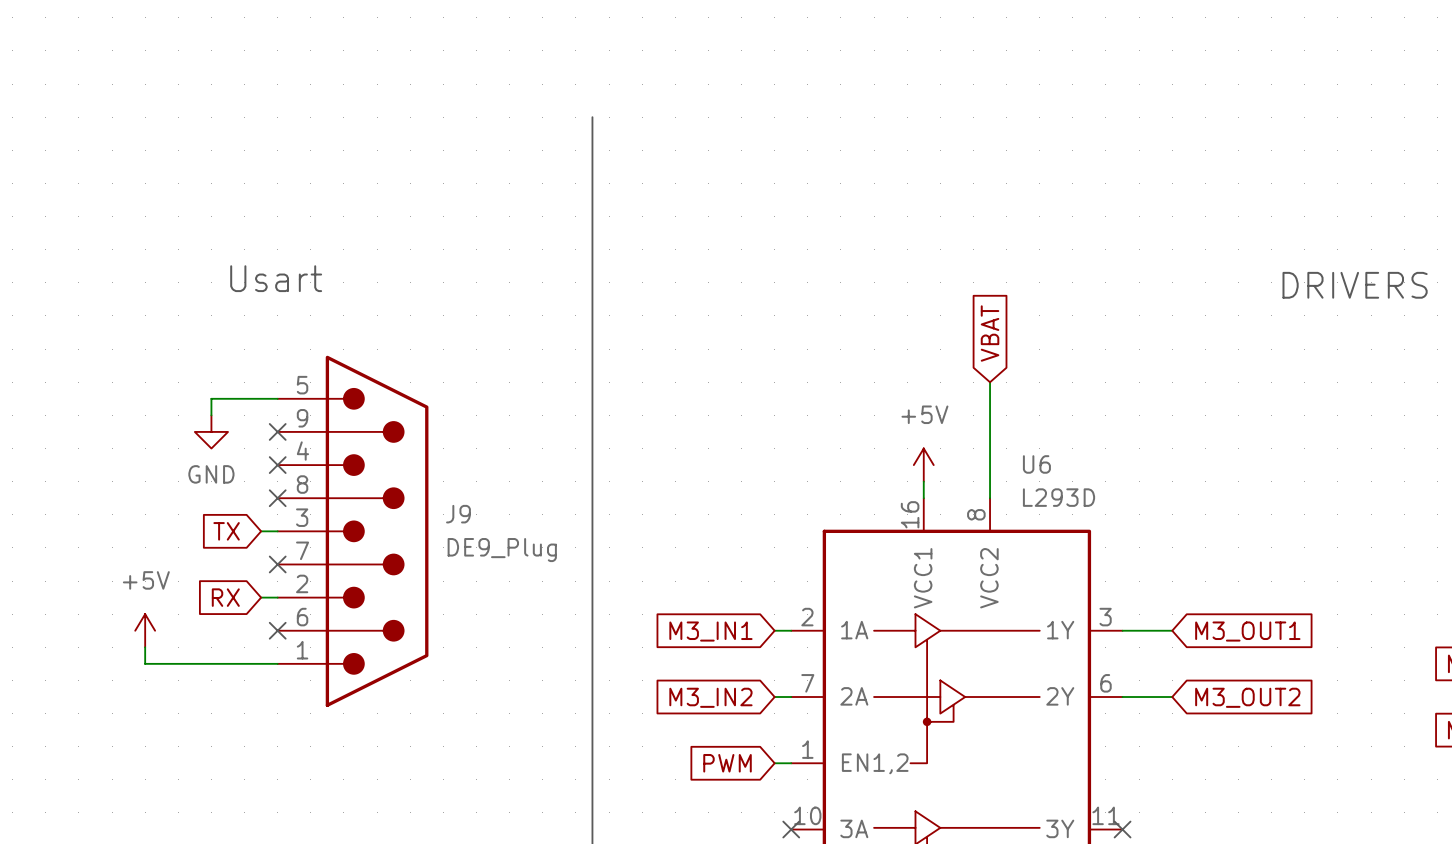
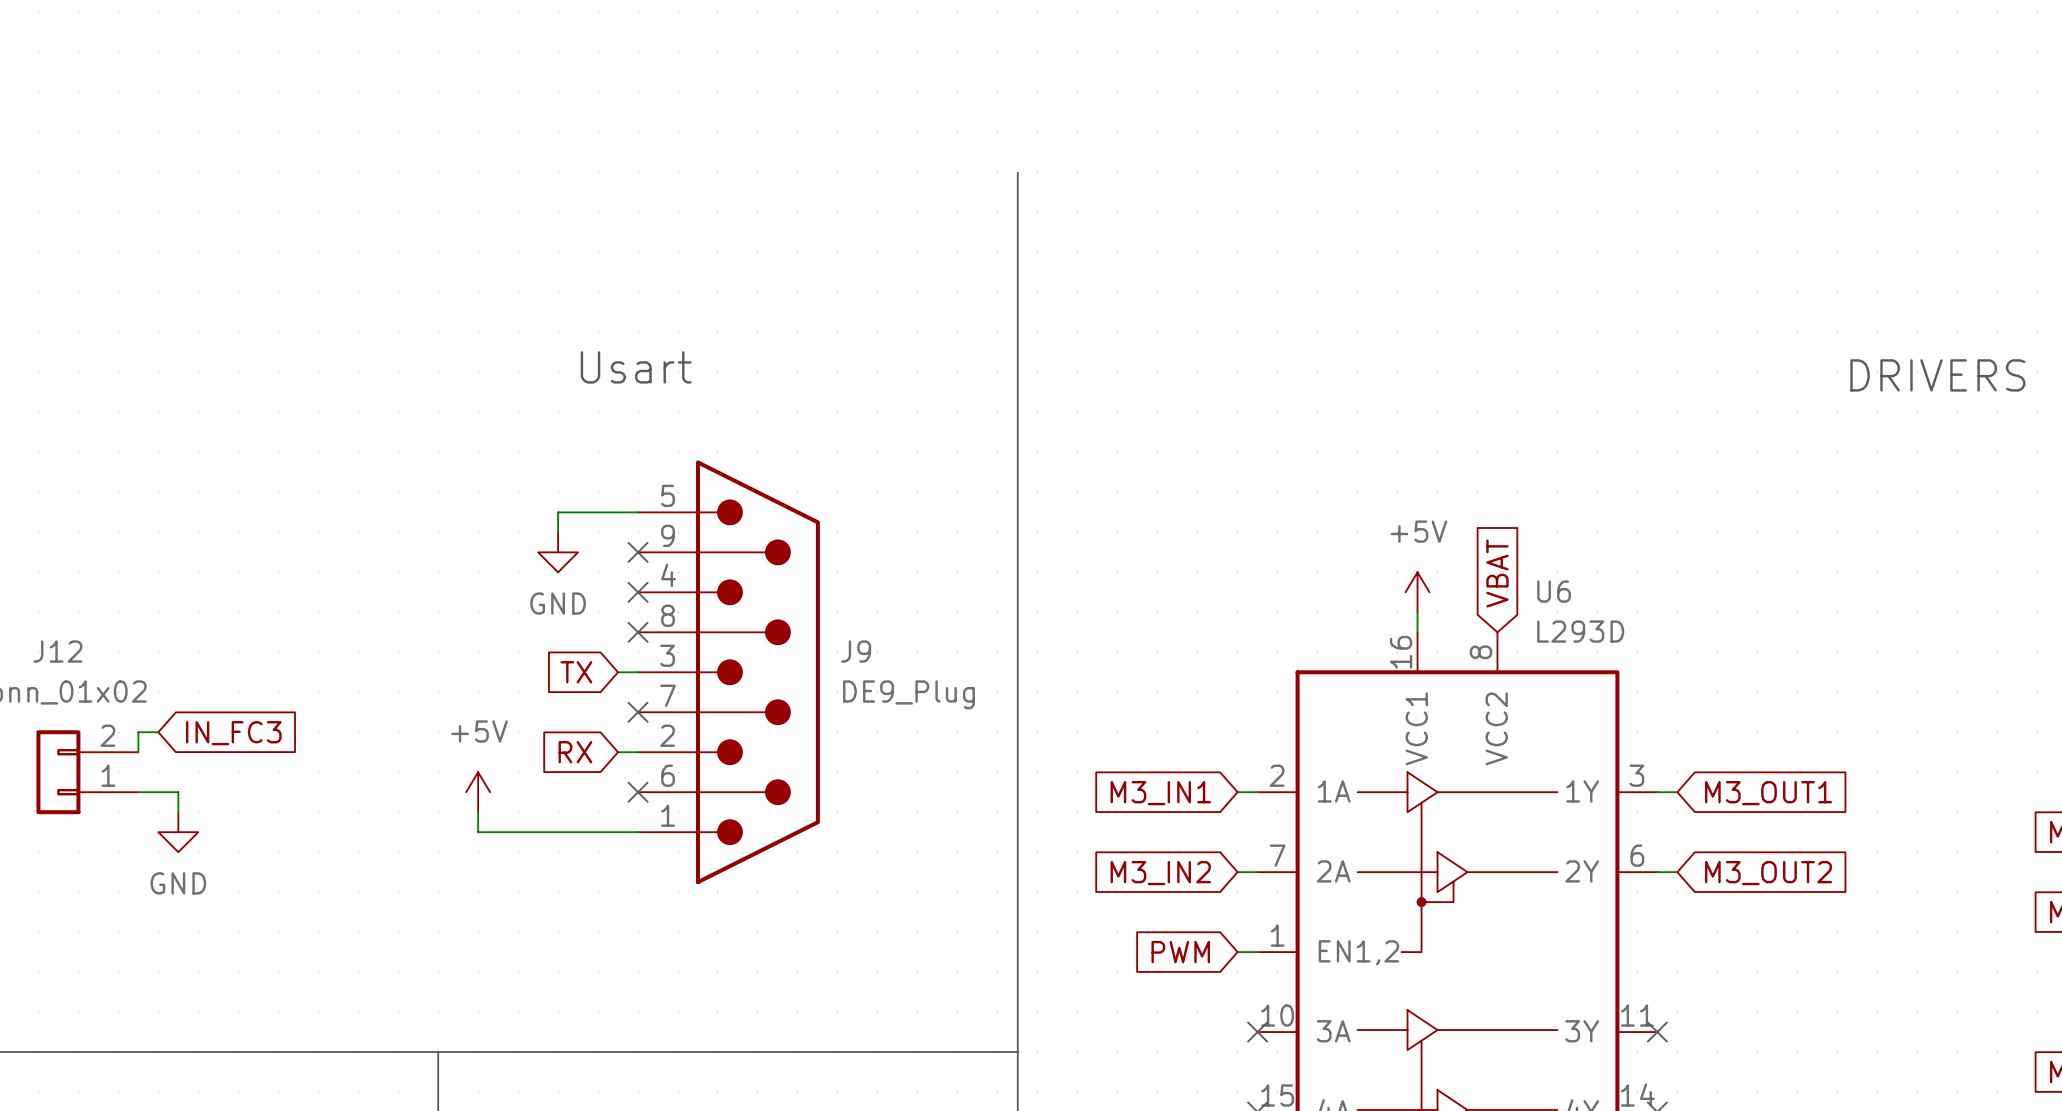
global label position: VBAT (990, 333) -> VBAT (1497, 573)
wire: (990, 382) (990, 498) -> none
wire: (1139, 630) (1172, 630) -> none
global label position: M3_OUT1 (1247, 631) -> M3_OUT1 (1768, 793)
wire: (1139, 697) (1172, 697) -> none
global label position: M3_OUT2 (1247, 697) -> M3_OUT2 (1768, 873)

